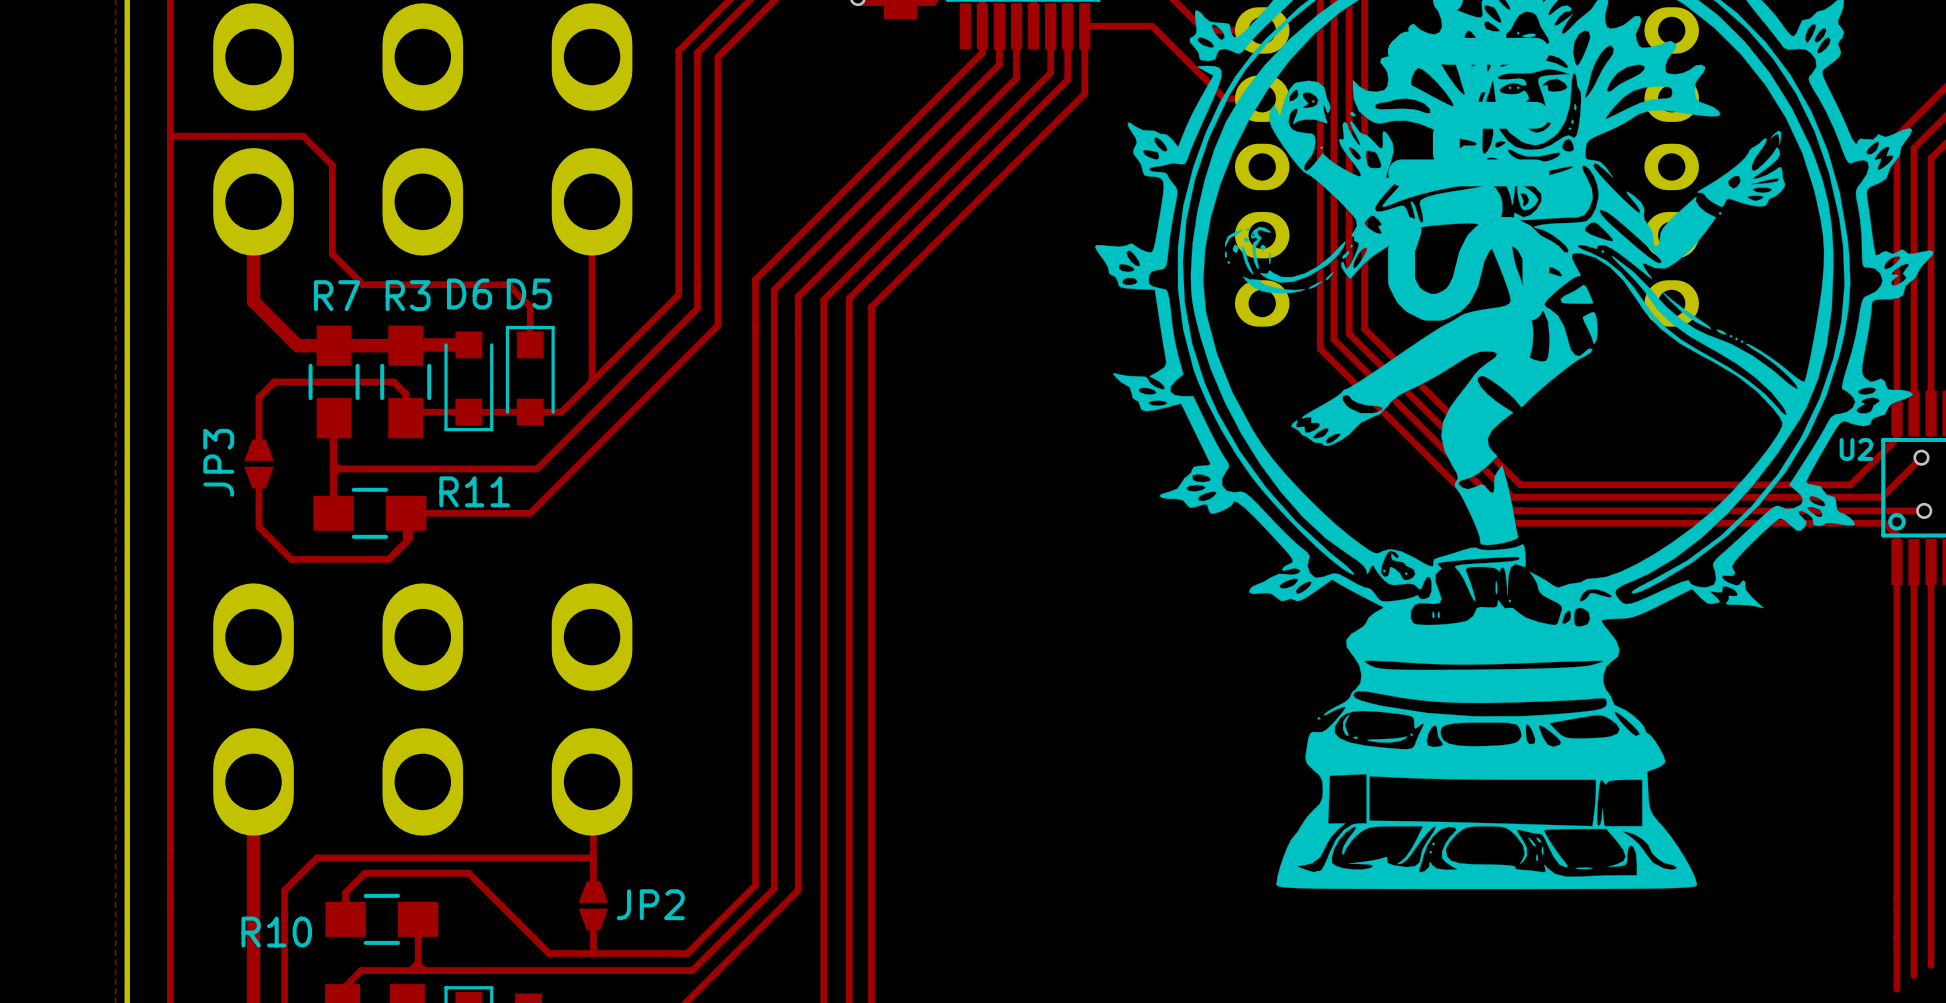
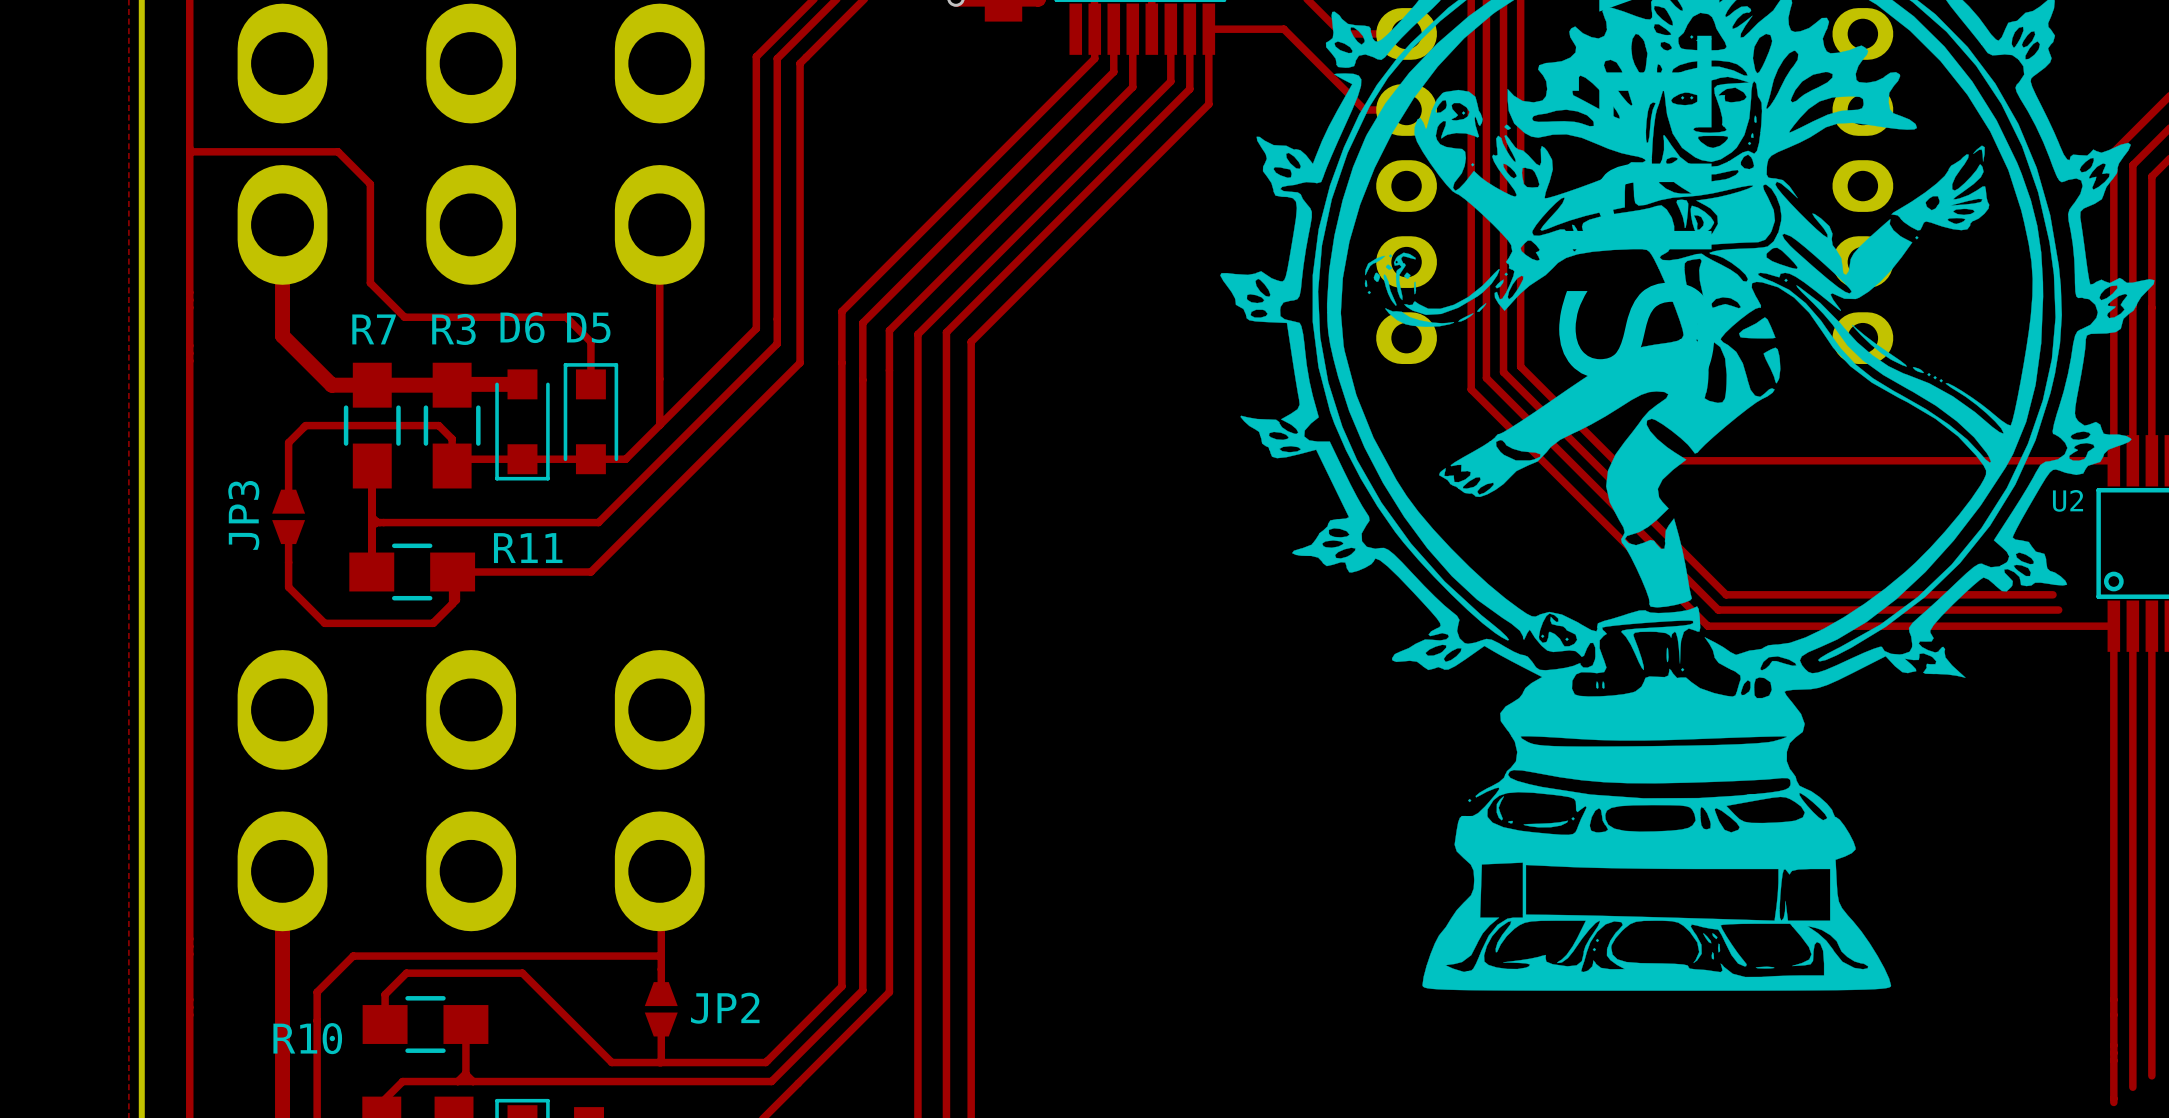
track: (1320, 348) (1494, 523) (1884, 523) (1896, 535) (1896, 554) -> (1471, 388) (1707, 626) (2113, 626)
track: (1449, 413) (1520, 484) (1850, 484) (1896, 438) (1896, 421) -> (1614, 460) (2113, 460)
track: (1921, 457) (1881, 497) (1512, 497) -> (2052, 594) (1726, 594) (1685, 554)
via: (1921, 457) -> none
track: (1505, 510) (1924, 510) -> (1677, 569) (1718, 610) (2058, 610)
via: (1924, 510) -> none

